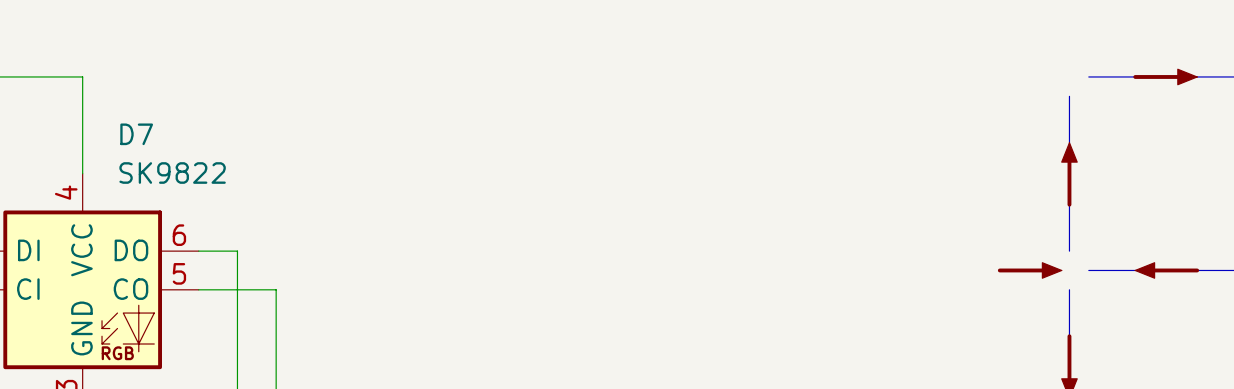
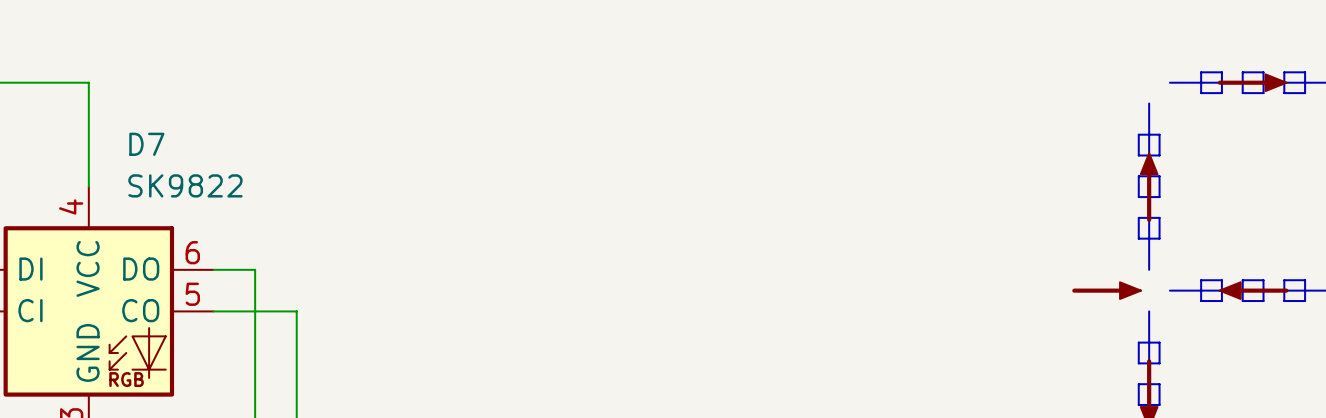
line: none -> (1201, 72) (1221, 72) (1221, 93) (1201, 93) (1201, 72)
line: none -> (1242, 72) (1263, 72) (1263, 93) (1242, 93) (1242, 72)
line: none -> (1284, 72) (1305, 72) (1305, 93) (1284, 93) (1284, 72)
line: none -> (1138, 134) (1138, 155) (1159, 155) (1159, 134) (1138, 134)
line: none -> (1138, 176) (1138, 197) (1159, 197) (1159, 176) (1138, 176)
line: none -> (1138, 217) (1138, 238) (1159, 238) (1159, 217) (1138, 217)
line: none -> (1201, 280) (1221, 280) (1221, 301) (1201, 301) (1201, 280)
line: none -> (1242, 280) (1242, 301) (1263, 301) (1263, 280) (1242, 280)
line: none -> (1284, 280) (1305, 280) (1305, 301) (1284, 301) (1284, 280)
line: none -> (1138, 342) (1159, 342) (1159, 363) (1138, 363) (1138, 342)
line: none -> (1138, 384) (1138, 404) (1159, 404) (1159, 384) (1138, 384)

